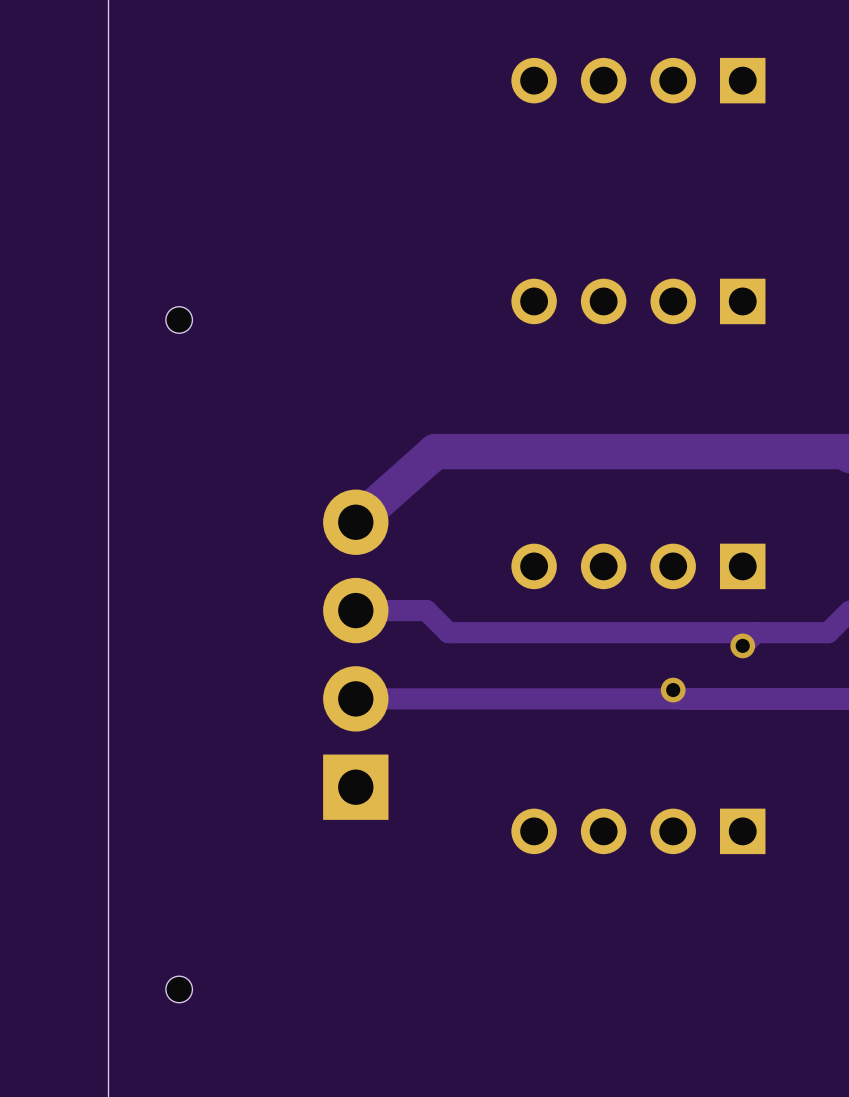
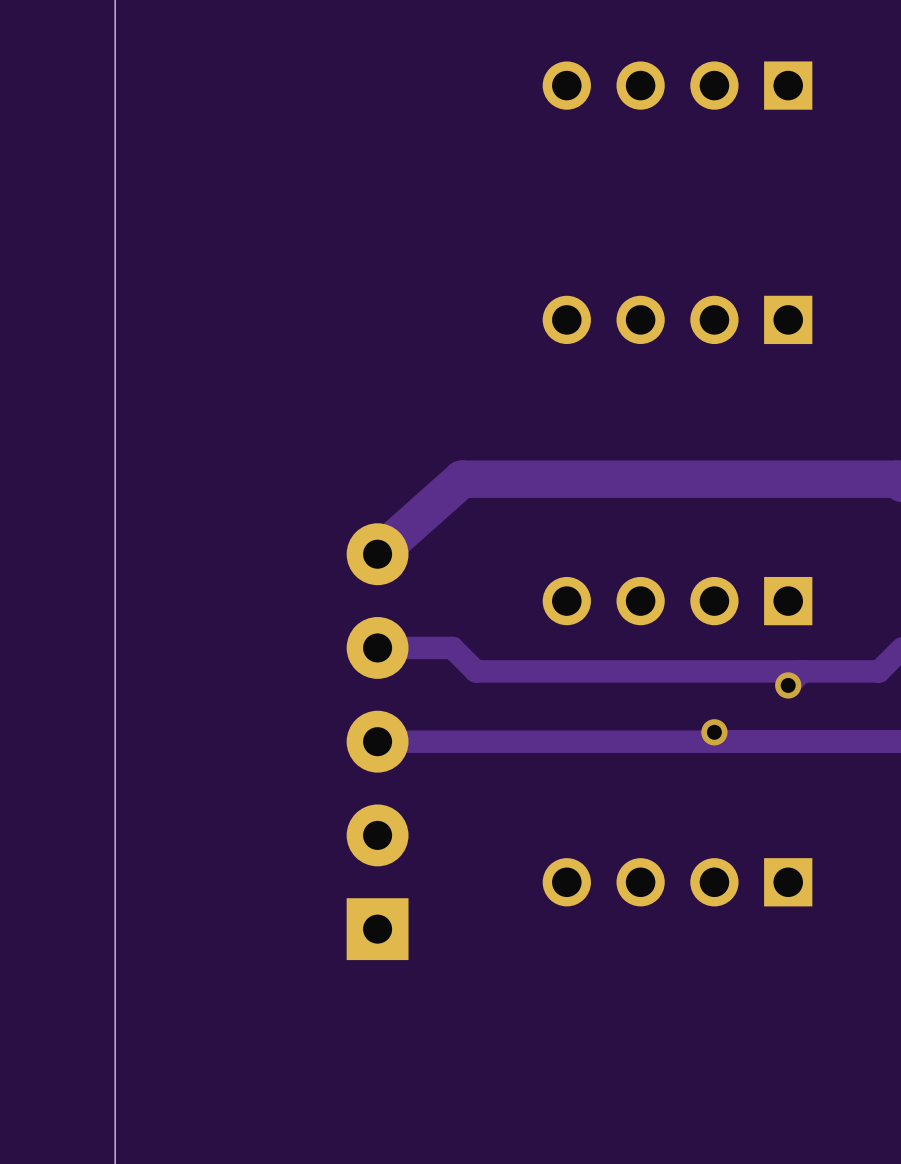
hole: (179, 319) -> none
part: (355, 654) -> none
part: none -> (377, 741)
hole: (179, 989) -> none

